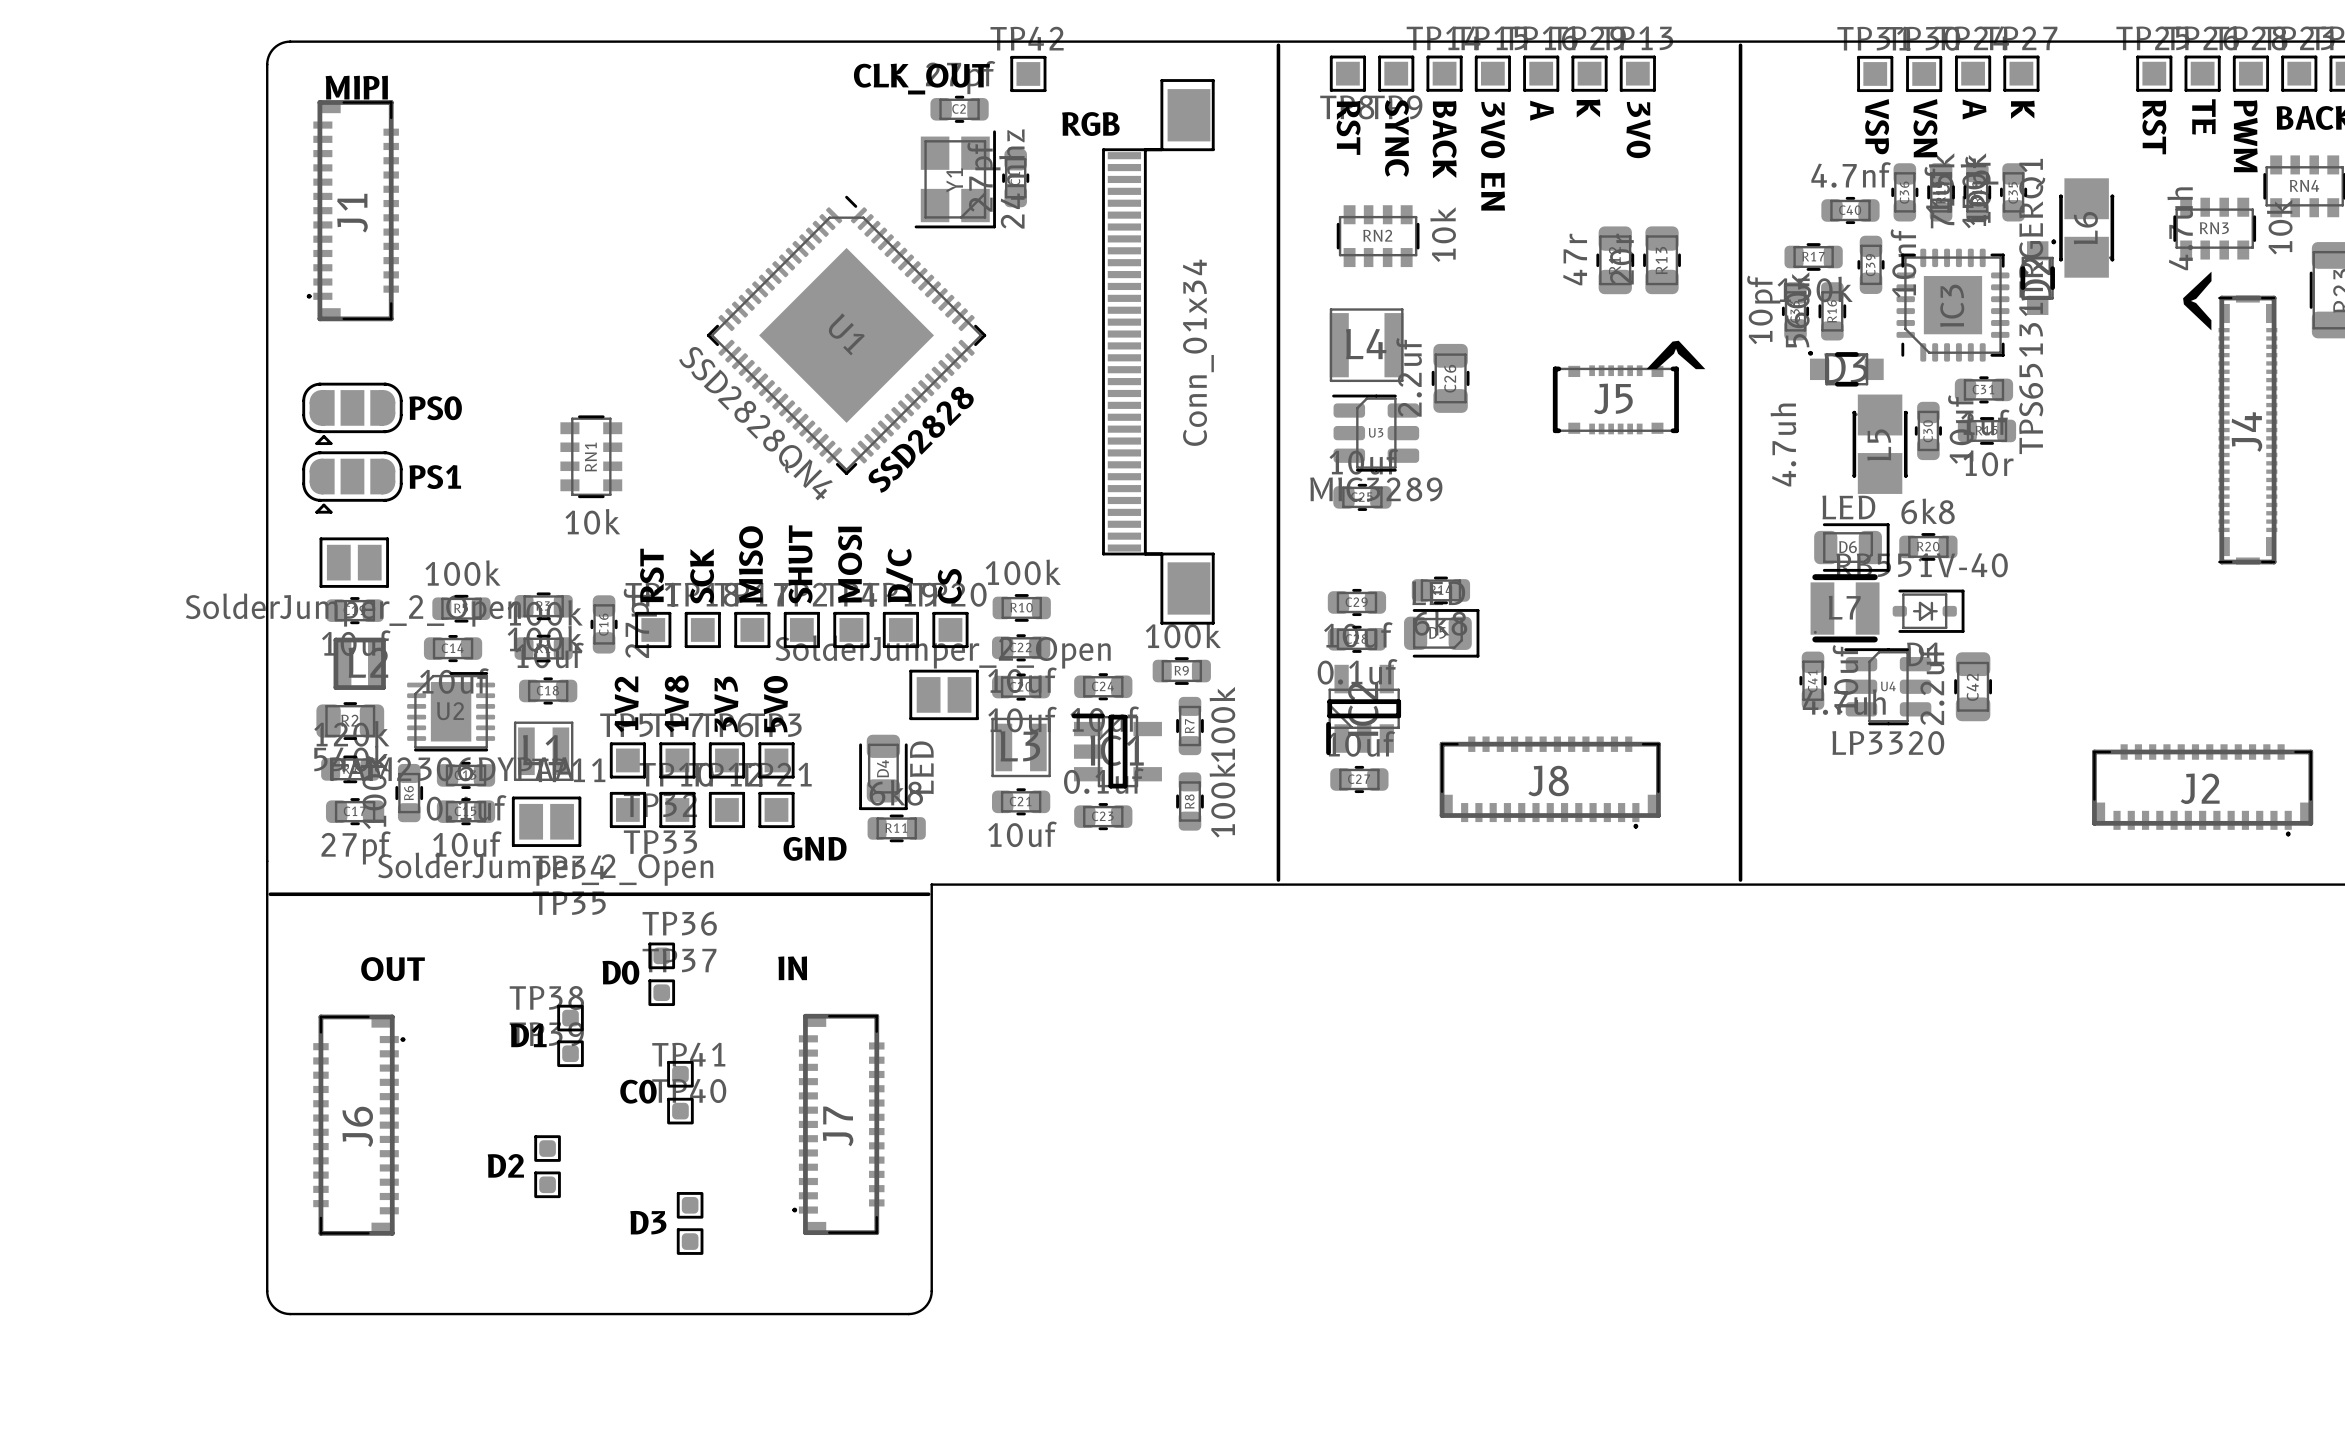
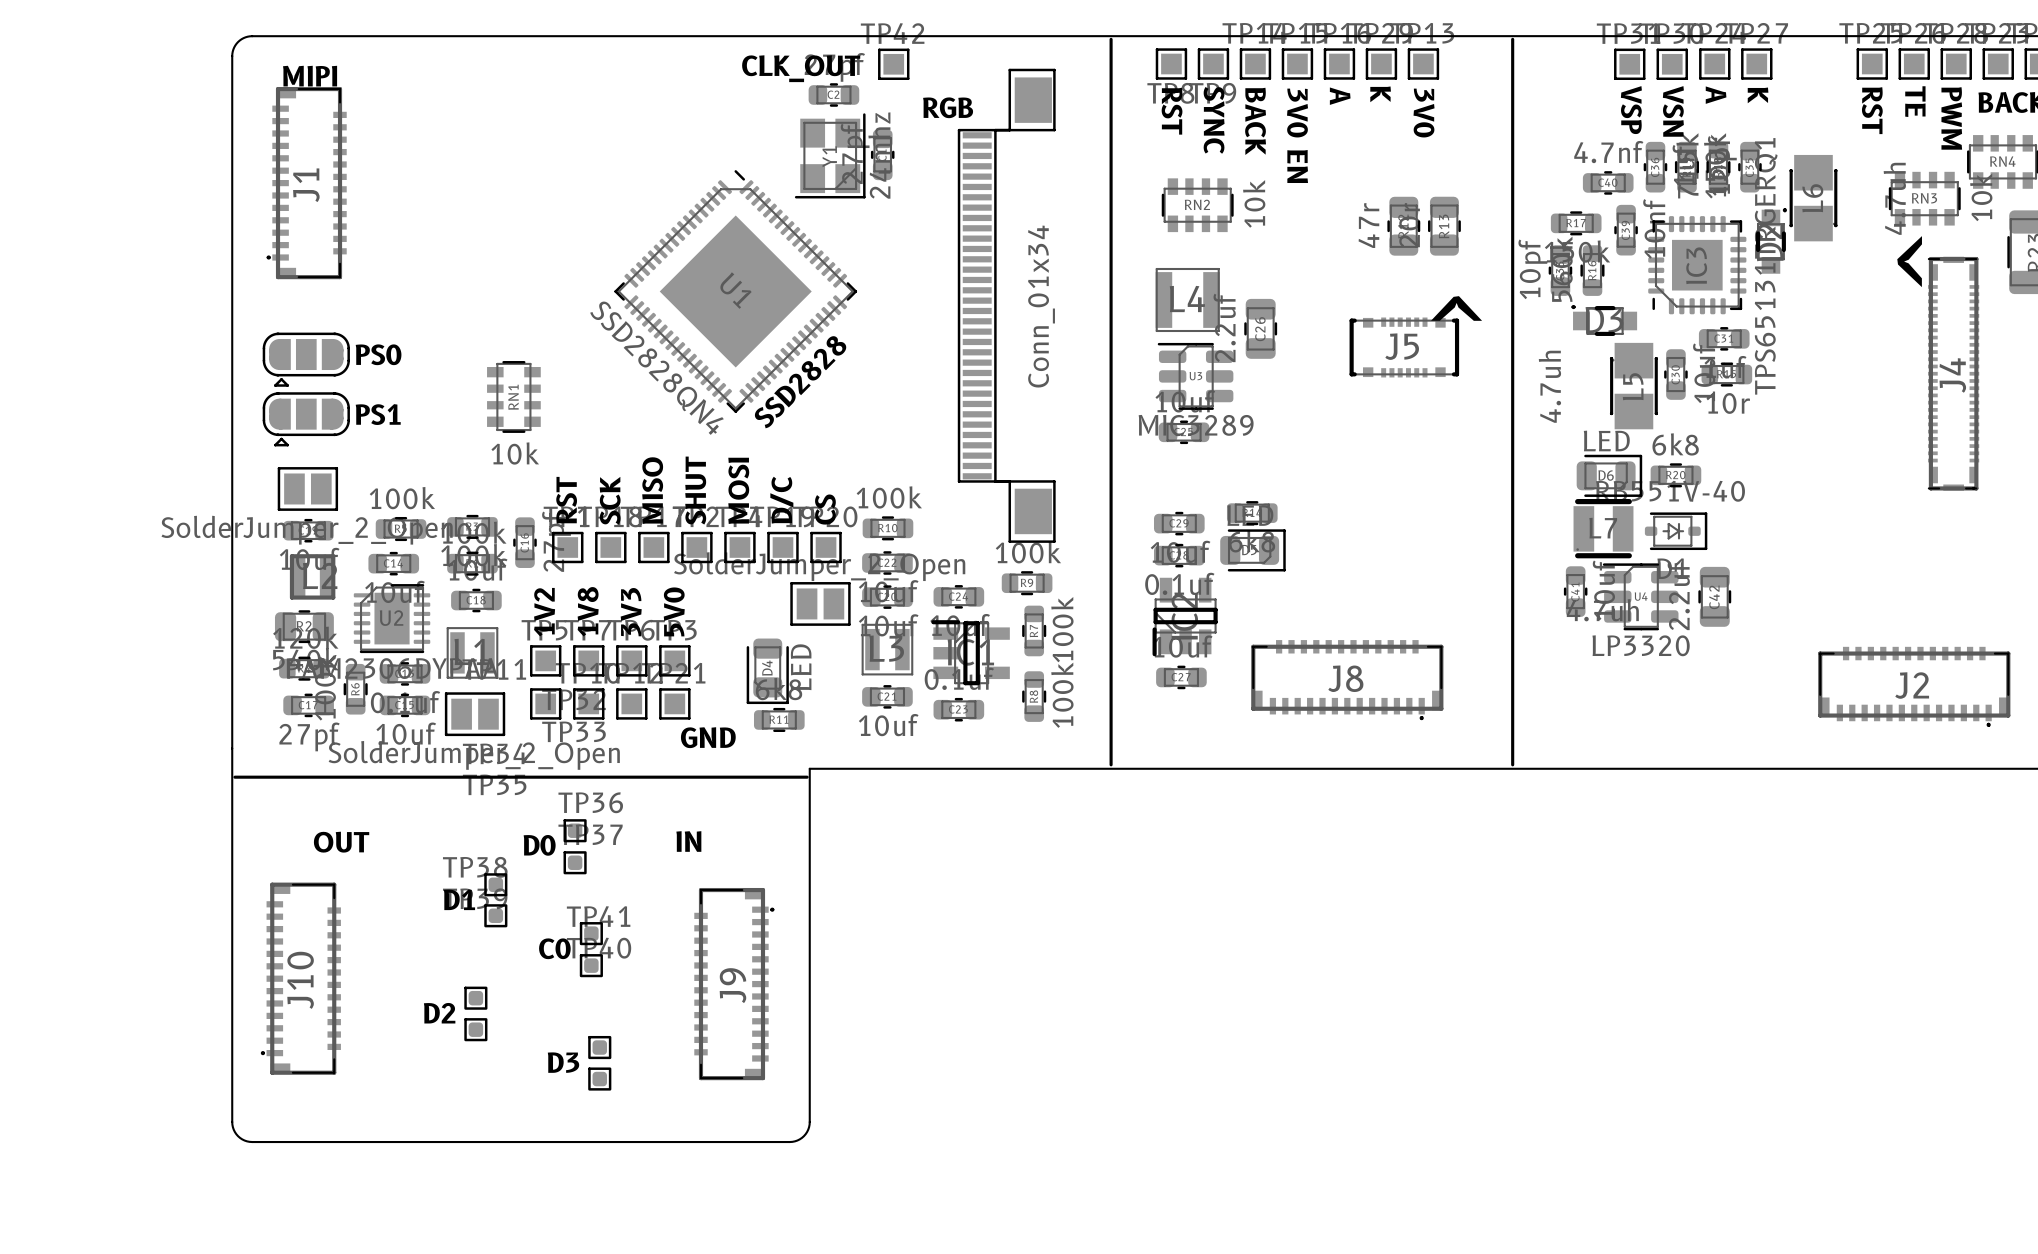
J7: (838, 1124) -> none
J6: (359, 1125) -> none
J10: none -> (300, 978)
J9: none -> (734, 984)

